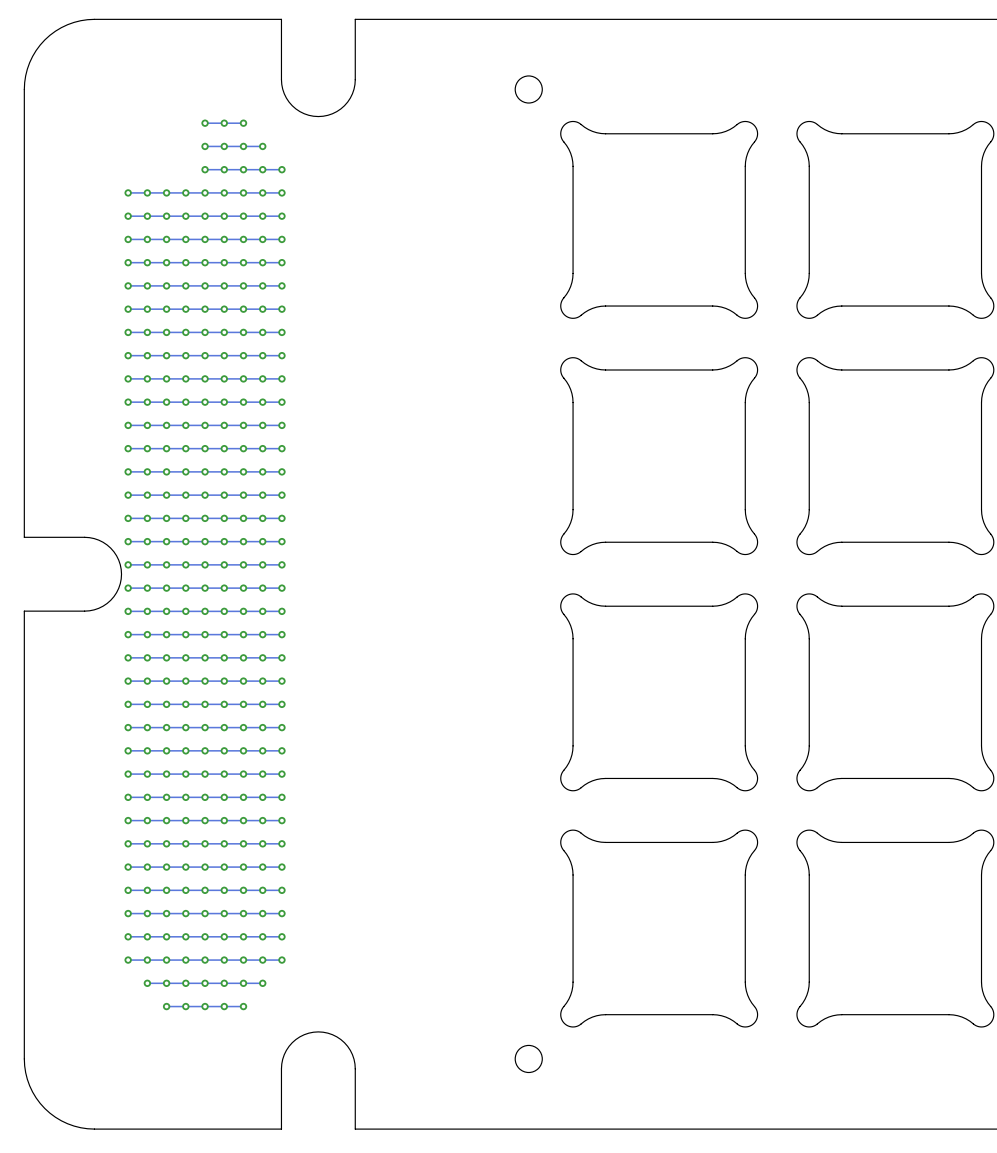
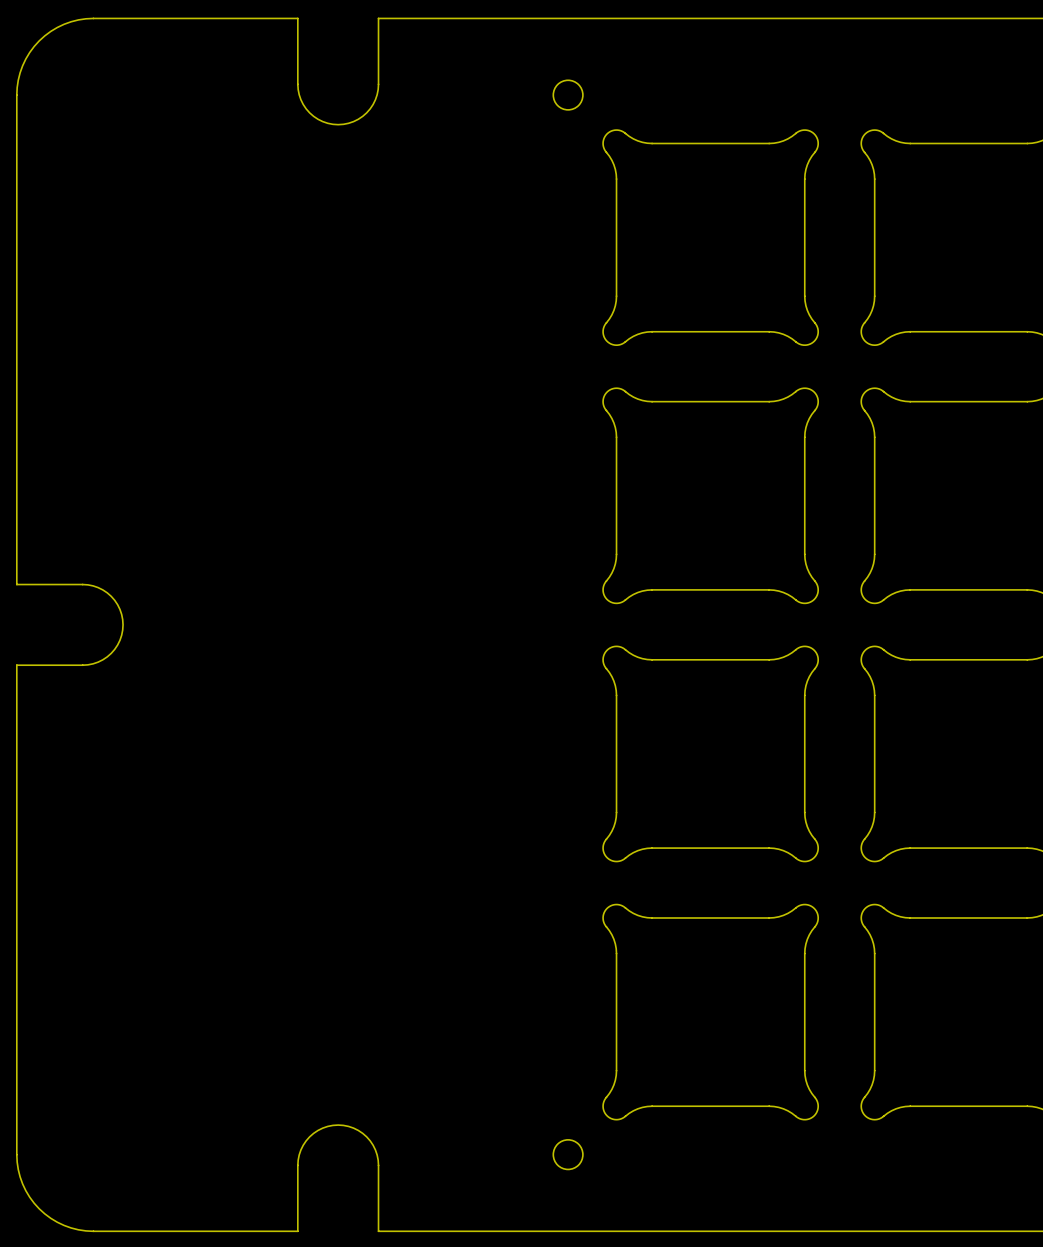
via: (205, 123) -> none
via: (224, 123) -> none
track: (243, 123) (205, 123) -> none
via: (243, 123) -> none
via: (205, 146) -> none
via: (224, 146) -> none
via: (243, 146) -> none
track: (262, 146) (205, 146) -> none
via: (262, 146) -> none
via: (205, 169) -> none
via: (224, 169) -> none
via: (243, 169) -> none
via: (262, 169) -> none
track: (281, 169) (205, 169) -> none
via: (281, 169) -> none
via: (128, 192) -> none
via: (147, 192) -> none
via: (166, 192) -> none
via: (185, 192) -> none
via: (205, 192) -> none
via: (224, 192) -> none
via: (243, 192) -> none
via: (262, 192) -> none
track: (281, 192) (128, 192) -> none
via: (281, 192) -> none
via: (128, 216) -> none
via: (147, 216) -> none
via: (166, 216) -> none
via: (185, 216) -> none
via: (205, 216) -> none
via: (224, 216) -> none
via: (243, 216) -> none
via: (262, 216) -> none
track: (281, 216) (128, 216) -> none
via: (281, 216) -> none
via: (128, 239) -> none
via: (147, 239) -> none
via: (166, 239) -> none
via: (185, 239) -> none
via: (205, 239) -> none
via: (224, 239) -> none
via: (243, 239) -> none
via: (262, 239) -> none
track: (281, 239) (128, 239) -> none
via: (281, 239) -> none
via: (128, 262) -> none
via: (147, 262) -> none
via: (166, 262) -> none
via: (185, 262) -> none
via: (205, 262) -> none
via: (224, 262) -> none
via: (243, 262) -> none
via: (262, 262) -> none
track: (281, 262) (128, 262) -> none
via: (281, 262) -> none
via: (128, 285) -> none
via: (147, 285) -> none
via: (166, 285) -> none
via: (185, 285) -> none
via: (205, 285) -> none
via: (224, 285) -> none
via: (243, 285) -> none
via: (262, 285) -> none
track: (281, 285) (128, 285) -> none
via: (281, 285) -> none
via: (128, 309) -> none
via: (147, 309) -> none
via: (166, 309) -> none
via: (185, 309) -> none
via: (205, 309) -> none
via: (224, 309) -> none
via: (243, 309) -> none
via: (262, 309) -> none
track: (281, 309) (128, 309) -> none
via: (281, 309) -> none
via: (128, 332) -> none
via: (147, 332) -> none
via: (166, 332) -> none
via: (185, 332) -> none
via: (205, 332) -> none
via: (224, 332) -> none
via: (243, 332) -> none
via: (262, 332) -> none
track: (281, 332) (128, 332) -> none
via: (281, 332) -> none
via: (128, 355) -> none
via: (147, 355) -> none
via: (166, 355) -> none
via: (185, 355) -> none
via: (205, 355) -> none
via: (224, 355) -> none
via: (243, 355) -> none
via: (262, 355) -> none
track: (281, 355) (128, 355) -> none
via: (281, 355) -> none
via: (128, 378) -> none
via: (147, 378) -> none
via: (166, 378) -> none
via: (185, 378) -> none
via: (205, 378) -> none
via: (224, 378) -> none
via: (243, 378) -> none
via: (262, 378) -> none
track: (281, 378) (128, 378) -> none
via: (281, 378) -> none
via: (128, 402) -> none
via: (147, 402) -> none
via: (166, 402) -> none
via: (185, 402) -> none
via: (205, 402) -> none
via: (224, 402) -> none
via: (243, 402) -> none
via: (262, 402) -> none
track: (281, 402) (128, 402) -> none
via: (281, 402) -> none
via: (128, 425) -> none
via: (147, 425) -> none
via: (166, 425) -> none
via: (185, 425) -> none
via: (205, 425) -> none
via: (224, 425) -> none
via: (243, 425) -> none
via: (262, 425) -> none
track: (281, 425) (128, 425) -> none
via: (281, 425) -> none
via: (128, 448) -> none
via: (147, 448) -> none
via: (166, 448) -> none
via: (185, 448) -> none
via: (205, 448) -> none
via: (224, 448) -> none
via: (243, 448) -> none
via: (262, 448) -> none
track: (281, 448) (128, 448) -> none
via: (281, 448) -> none
via: (128, 471) -> none
via: (147, 471) -> none
via: (166, 471) -> none
via: (185, 471) -> none
via: (205, 471) -> none
via: (224, 471) -> none
via: (243, 471) -> none
via: (262, 471) -> none
track: (281, 471) (128, 471) -> none
via: (281, 471) -> none
via: (128, 495) -> none
via: (147, 495) -> none
via: (166, 495) -> none
via: (185, 495) -> none
via: (205, 495) -> none
via: (224, 495) -> none
via: (243, 495) -> none
via: (262, 495) -> none
track: (281, 495) (128, 495) -> none
via: (281, 495) -> none
via: (128, 518) -> none
via: (147, 518) -> none
via: (166, 518) -> none
via: (185, 518) -> none
via: (205, 518) -> none
via: (224, 518) -> none
via: (243, 518) -> none
via: (262, 518) -> none
track: (281, 518) (128, 518) -> none
via: (281, 518) -> none
via: (128, 541) -> none
via: (147, 541) -> none
via: (166, 541) -> none
via: (185, 541) -> none
via: (205, 541) -> none
via: (224, 541) -> none
via: (243, 541) -> none
via: (262, 541) -> none
track: (281, 541) (128, 541) -> none
via: (281, 541) -> none
via: (128, 564) -> none
via: (147, 564) -> none
via: (166, 564) -> none
via: (185, 564) -> none
via: (205, 564) -> none
via: (224, 564) -> none
via: (243, 564) -> none
via: (262, 564) -> none
track: (281, 564) (128, 564) -> none
via: (281, 564) -> none
via: (128, 588) -> none
via: (147, 588) -> none
via: (166, 588) -> none
via: (185, 588) -> none
via: (205, 588) -> none
via: (224, 588) -> none
via: (243, 588) -> none
via: (262, 588) -> none
track: (281, 588) (128, 588) -> none
via: (281, 588) -> none
via: (128, 611) -> none
via: (147, 611) -> none
via: (166, 611) -> none
via: (185, 611) -> none
via: (205, 611) -> none
via: (224, 611) -> none
via: (243, 611) -> none
via: (262, 611) -> none
track: (281, 611) (128, 611) -> none
via: (281, 611) -> none
via: (128, 634) -> none
via: (147, 634) -> none
via: (166, 634) -> none
via: (185, 634) -> none
via: (205, 634) -> none
via: (224, 634) -> none
via: (243, 634) -> none
via: (262, 634) -> none
track: (281, 634) (128, 634) -> none
via: (281, 634) -> none
via: (128, 657) -> none
via: (147, 657) -> none
via: (166, 657) -> none
via: (185, 657) -> none
via: (205, 657) -> none
via: (224, 657) -> none
via: (243, 657) -> none
via: (262, 657) -> none
track: (281, 657) (128, 657) -> none
via: (281, 657) -> none
via: (128, 681) -> none
via: (147, 681) -> none
via: (166, 681) -> none
via: (185, 681) -> none
via: (205, 681) -> none
via: (224, 681) -> none
via: (243, 681) -> none
via: (262, 681) -> none
track: (281, 681) (128, 681) -> none
via: (281, 681) -> none
via: (128, 704) -> none
via: (147, 704) -> none
via: (166, 704) -> none
via: (185, 704) -> none
via: (205, 704) -> none
via: (224, 704) -> none
via: (243, 704) -> none
via: (262, 704) -> none
track: (281, 704) (128, 704) -> none
via: (281, 704) -> none
via: (128, 727) -> none
via: (147, 727) -> none
via: (166, 727) -> none
via: (185, 727) -> none
via: (205, 727) -> none
via: (224, 727) -> none
via: (243, 727) -> none
via: (262, 727) -> none
track: (281, 727) (128, 727) -> none
via: (281, 727) -> none
via: (128, 750) -> none
via: (147, 750) -> none
via: (166, 750) -> none
via: (185, 750) -> none
via: (205, 750) -> none
via: (224, 750) -> none
via: (243, 750) -> none
via: (262, 750) -> none
track: (281, 750) (128, 750) -> none
via: (281, 750) -> none
via: (128, 774) -> none
via: (147, 774) -> none
via: (166, 774) -> none
via: (185, 774) -> none
via: (205, 774) -> none
via: (224, 774) -> none
via: (243, 774) -> none
via: (262, 774) -> none
track: (281, 774) (128, 774) -> none
via: (281, 774) -> none
via: (128, 797) -> none
via: (147, 797) -> none
via: (166, 797) -> none
via: (185, 797) -> none
via: (205, 797) -> none
via: (224, 797) -> none
via: (243, 797) -> none
via: (262, 797) -> none
track: (281, 797) (128, 797) -> none
via: (281, 797) -> none
via: (128, 820) -> none
via: (147, 820) -> none
via: (166, 820) -> none
via: (185, 820) -> none
via: (205, 820) -> none
via: (224, 820) -> none
via: (243, 820) -> none
via: (262, 820) -> none
track: (281, 820) (128, 820) -> none
via: (281, 820) -> none
via: (128, 843) -> none
via: (147, 843) -> none
via: (166, 843) -> none
via: (185, 843) -> none
via: (205, 843) -> none
via: (224, 843) -> none
via: (243, 843) -> none
via: (262, 843) -> none
track: (281, 843) (128, 843) -> none
via: (281, 843) -> none
via: (128, 867) -> none
via: (147, 867) -> none
via: (166, 867) -> none
via: (185, 867) -> none
via: (205, 867) -> none
via: (224, 867) -> none
via: (243, 867) -> none
via: (262, 867) -> none
track: (281, 867) (128, 867) -> none
via: (281, 867) -> none
via: (128, 890) -> none
via: (147, 890) -> none
via: (166, 890) -> none
via: (185, 890) -> none
via: (205, 890) -> none
via: (224, 890) -> none
via: (243, 890) -> none
via: (262, 890) -> none
track: (281, 890) (128, 890) -> none
via: (281, 890) -> none
via: (128, 913) -> none
via: (147, 913) -> none
via: (166, 913) -> none
via: (185, 913) -> none
via: (205, 913) -> none
via: (224, 913) -> none
via: (243, 913) -> none
via: (262, 913) -> none
track: (281, 913) (128, 913) -> none
via: (281, 913) -> none
via: (128, 936) -> none
via: (147, 936) -> none
via: (166, 936) -> none
via: (185, 936) -> none
via: (205, 936) -> none
via: (224, 936) -> none
via: (243, 936) -> none
via: (262, 936) -> none
track: (281, 936) (128, 936) -> none
via: (281, 936) -> none
via: (128, 960) -> none
via: (147, 960) -> none
via: (166, 960) -> none
via: (185, 960) -> none
via: (205, 960) -> none
via: (224, 960) -> none
via: (243, 960) -> none
via: (262, 960) -> none
track: (281, 960) (128, 960) -> none
via: (281, 960) -> none
via: (147, 983) -> none
via: (166, 983) -> none
via: (185, 983) -> none
via: (205, 983) -> none
via: (224, 983) -> none
via: (243, 983) -> none
track: (262, 983) (147, 983) -> none
via: (262, 983) -> none
via: (166, 1006) -> none
via: (185, 1006) -> none
via: (205, 1006) -> none
via: (224, 1006) -> none
track: (243, 1006) (166, 1006) -> none
via: (243, 1006) -> none

